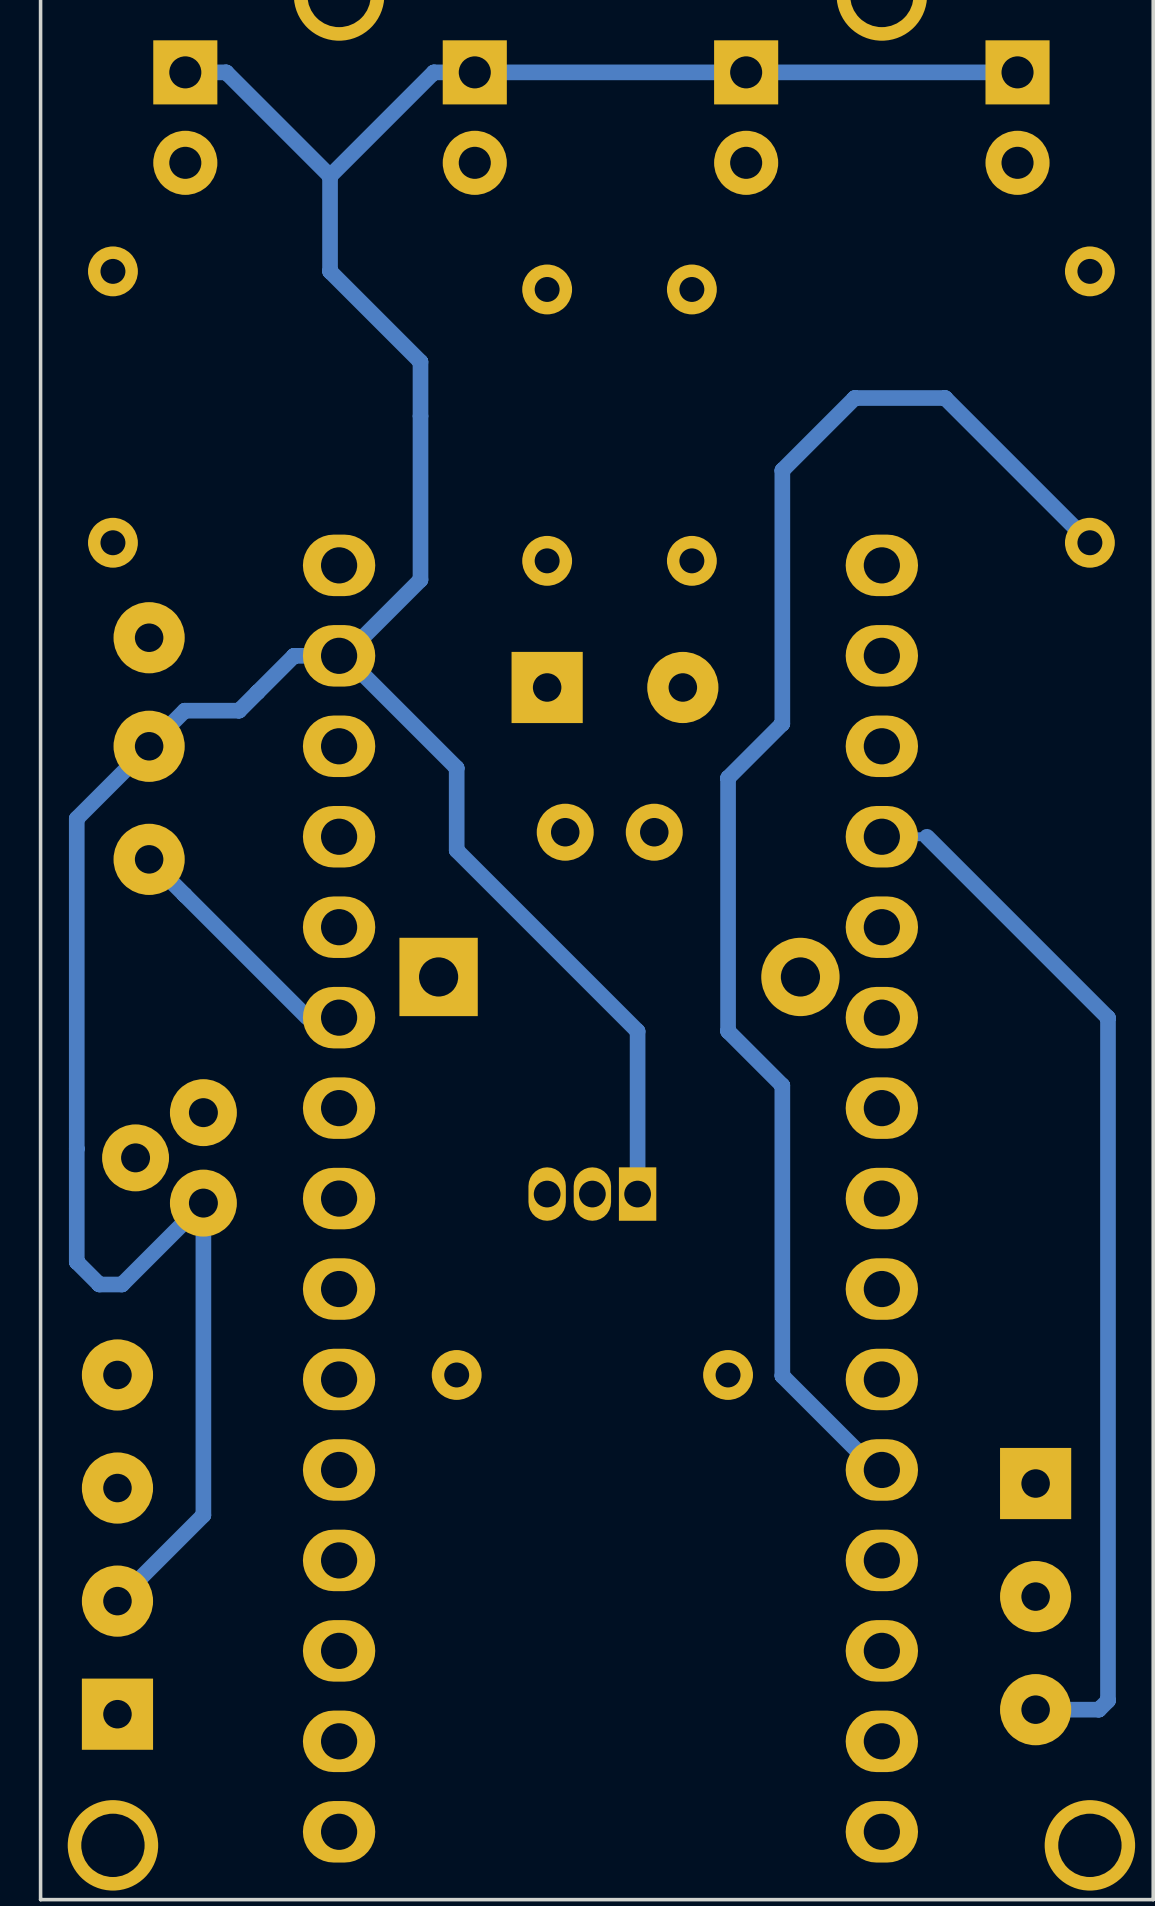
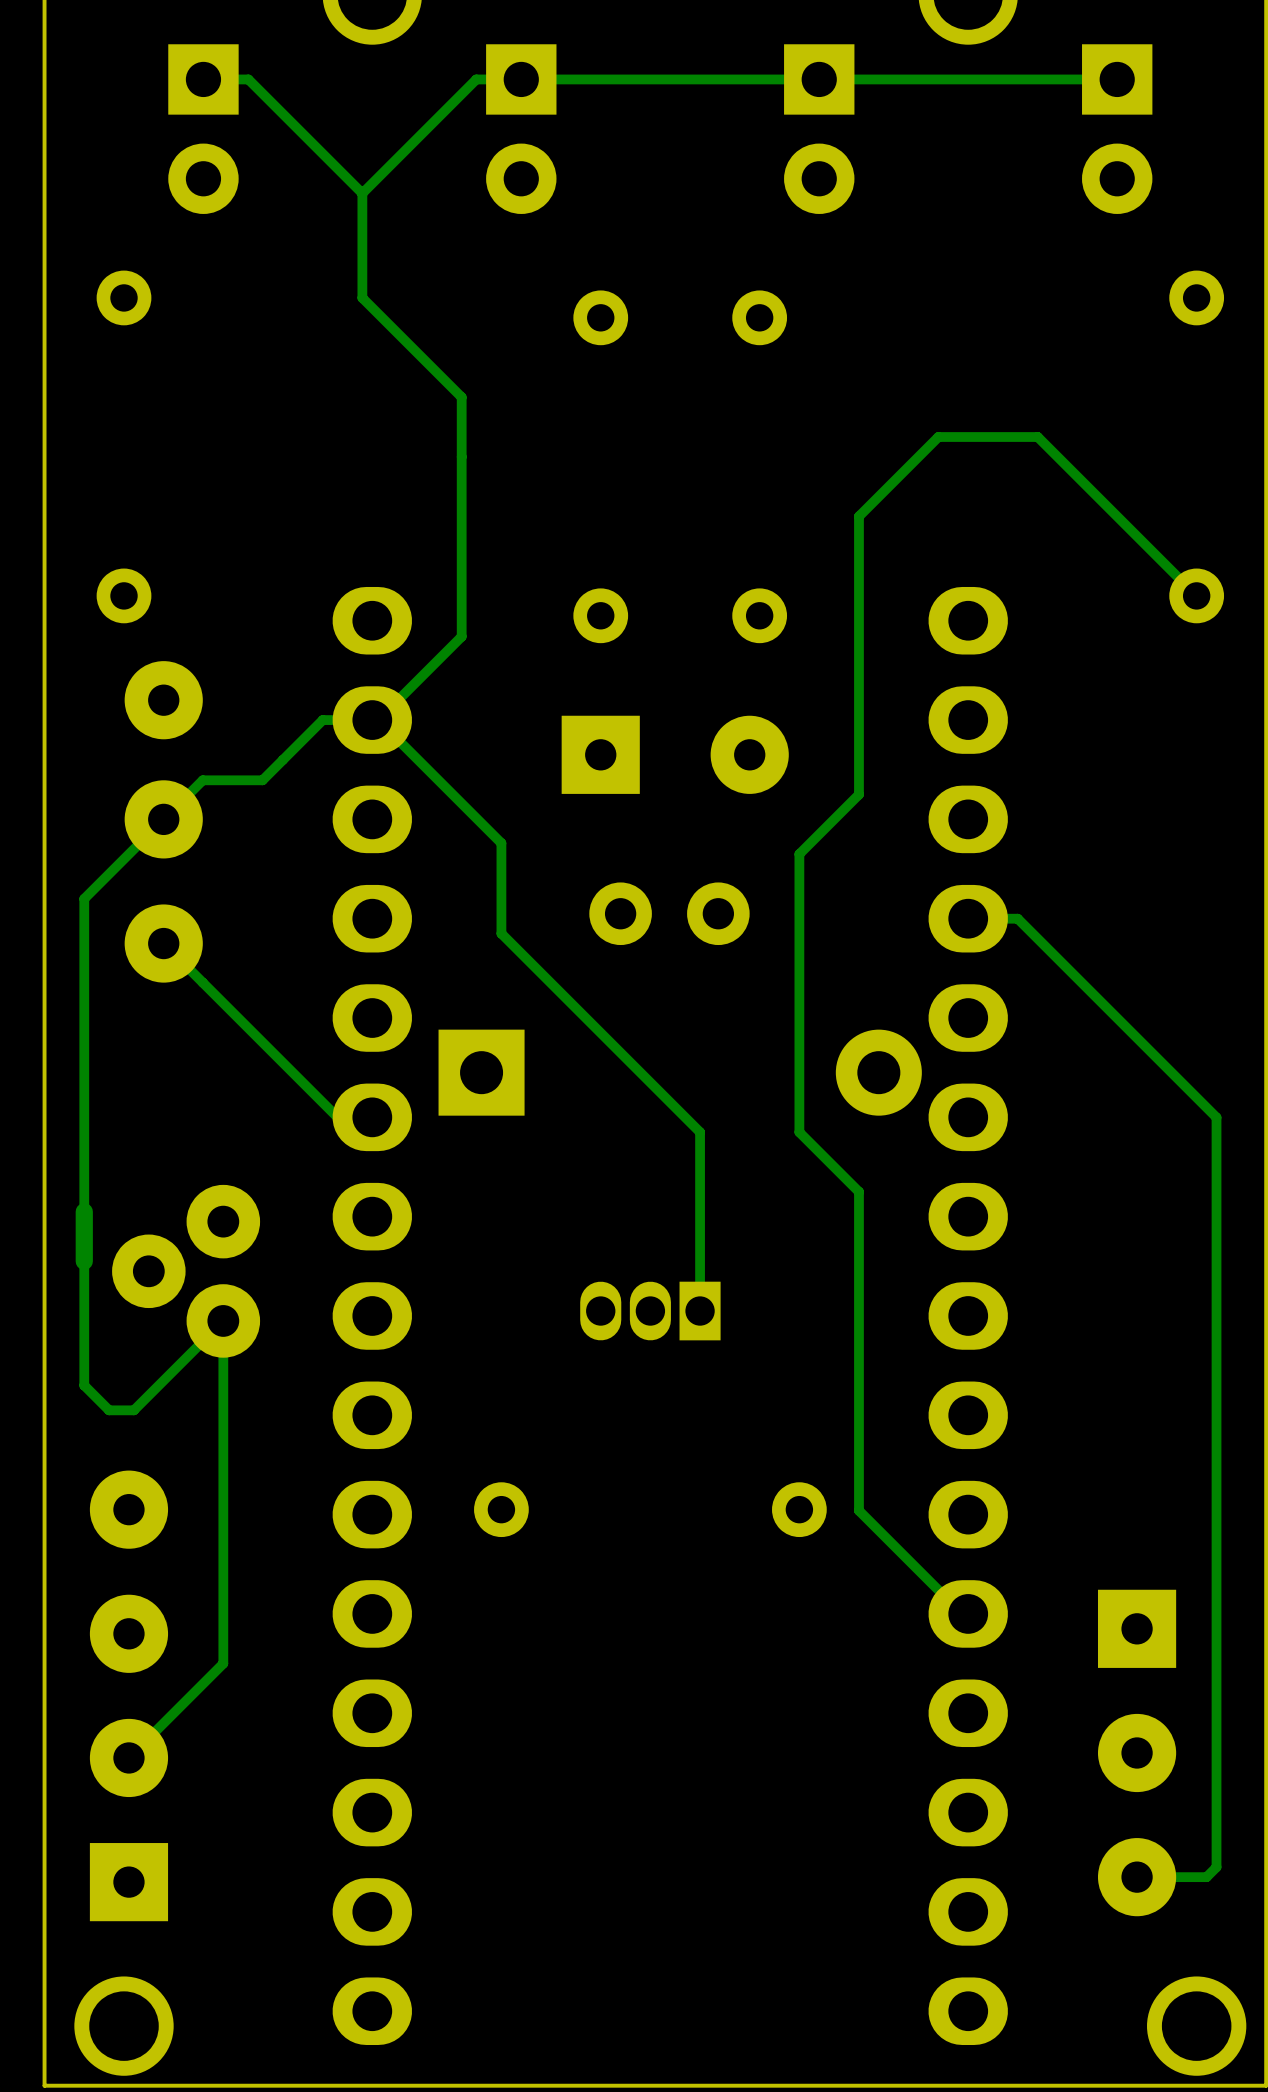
track width: thick (185, 72) (226, 72) (330, 176) -> thin (203, 79) (248, 79) (362, 193)
track width: thick (1017, 72) (433, 72) (330, 176) -> thin (1117, 79) (476, 79) (362, 193)
track width: thick (330, 176) (330, 271) (420, 361) (420, 579) (344, 655) (456, 767) (456, 850) (637, 1031) (637, 1194) -> thin (362, 193) (362, 297) (461, 397) (461, 636) (378, 720) (501, 843) (501, 933) (700, 1132) (700, 1311)
track width: thick (1089, 542) (945, 398) (854, 398) (782, 470) (782, 723) (728, 777) (728, 1031) (782, 1085) (782, 1375) (876, 1469) -> thin (1196, 595) (1037, 437) (938, 437) (858, 516) (858, 794) (799, 854) (799, 1132) (858, 1191) (858, 1510) (962, 1613)
track width: thick (339, 655) (294, 655) (239, 710) (184, 710) (76, 818) (76, 1103) -> thin (372, 720) (322, 720) (262, 780) (202, 780) (84, 898) (84, 1211)
track width: thick (926, 836) (1107, 1017) (1107, 1700) (1098, 1709) (1035, 1709) -> thin (1017, 918) (1216, 1117) (1216, 1867) (1206, 1877) (1137, 1877)
track width: thick (149, 859) (307, 1017) -> thin (163, 943) (337, 1117)
track width: thick (76, 1148) (76, 1261) (99, 1284) (121, 1284) (203, 1203) (203, 1515) (117, 1601) -> thin (84, 1261) (84, 1385) (109, 1410) (133, 1410) (223, 1320) (223, 1663) (128, 1757)

